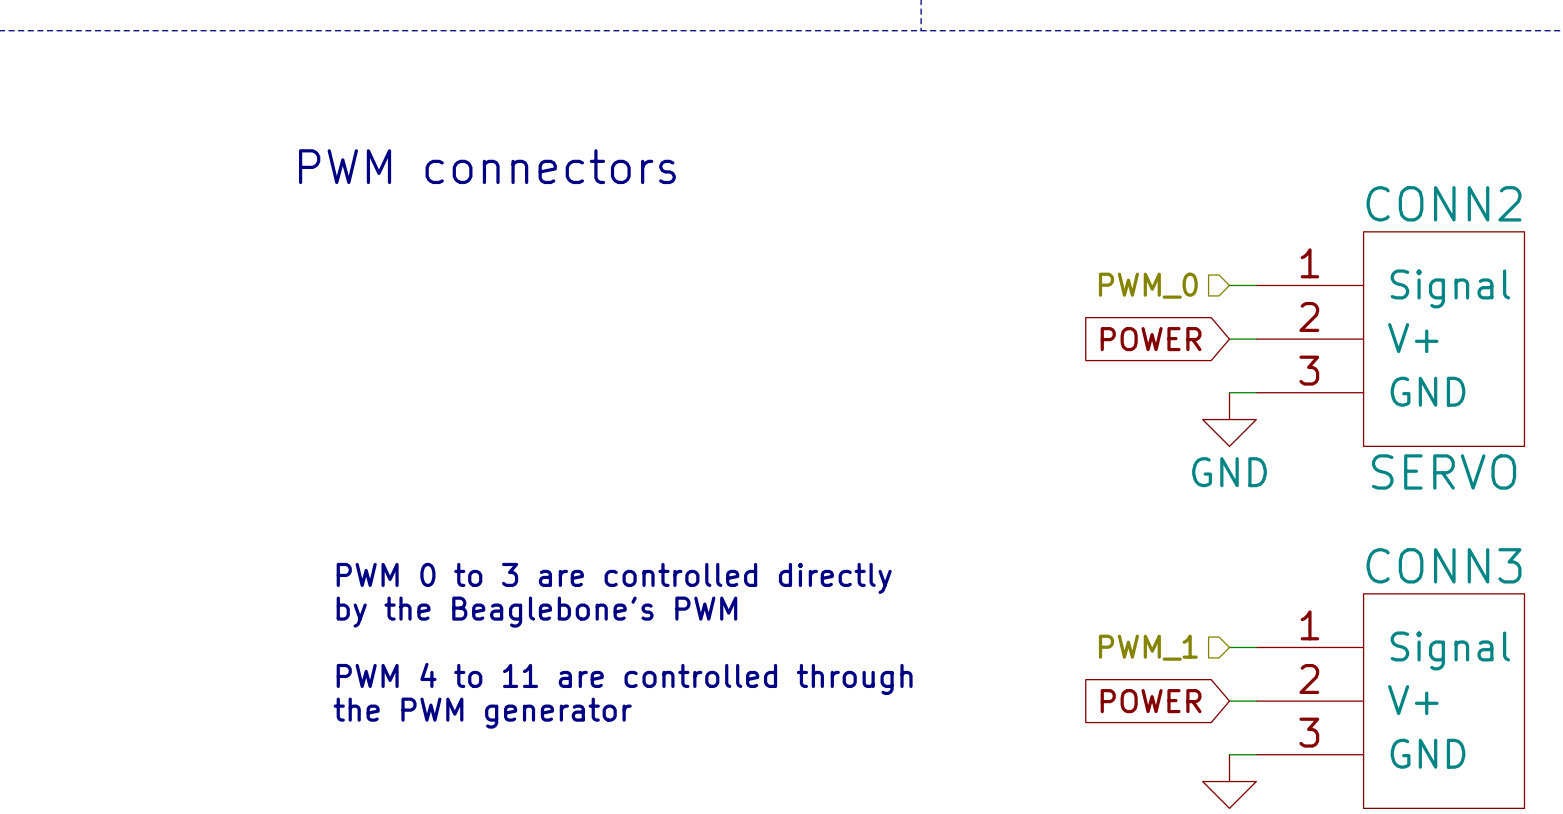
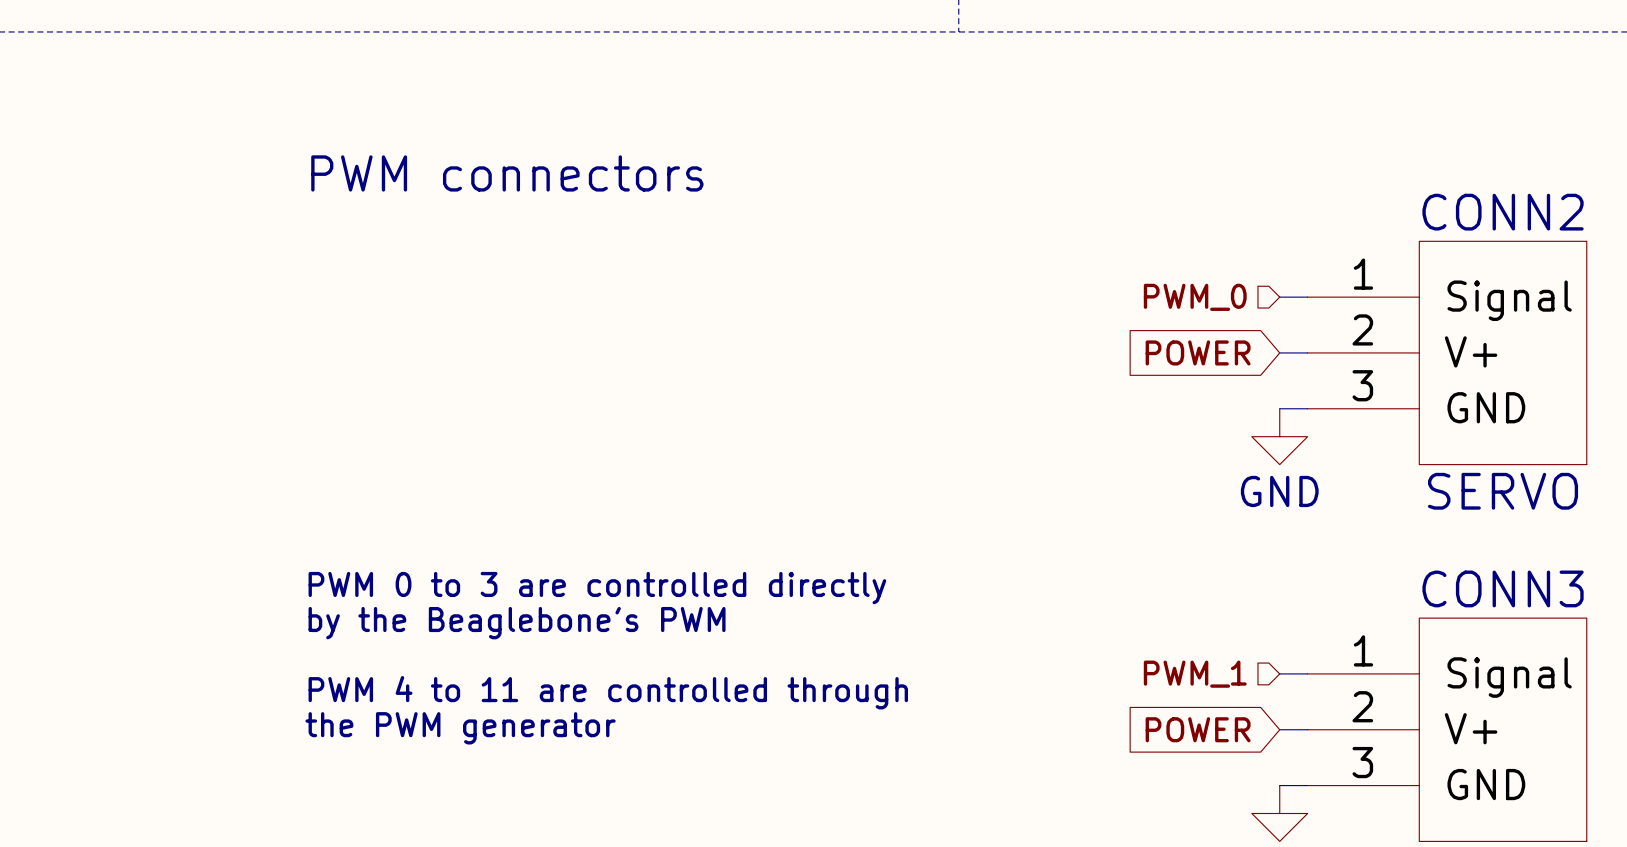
text position: PWM 0 to 3 are controlled directly (614, 578) -> PWM 0 to 3 are controlled directly (597, 588)
text position: by the Beaglebone's PWM (536, 612) -> by the Beaglebone's PWM (517, 623)
text position: PWM 4 to 11 are controlled through (624, 678) -> PWM 4 to 11 are controlled through (608, 692)
text position: the PWM generator (482, 713) -> the PWM generator (460, 728)

